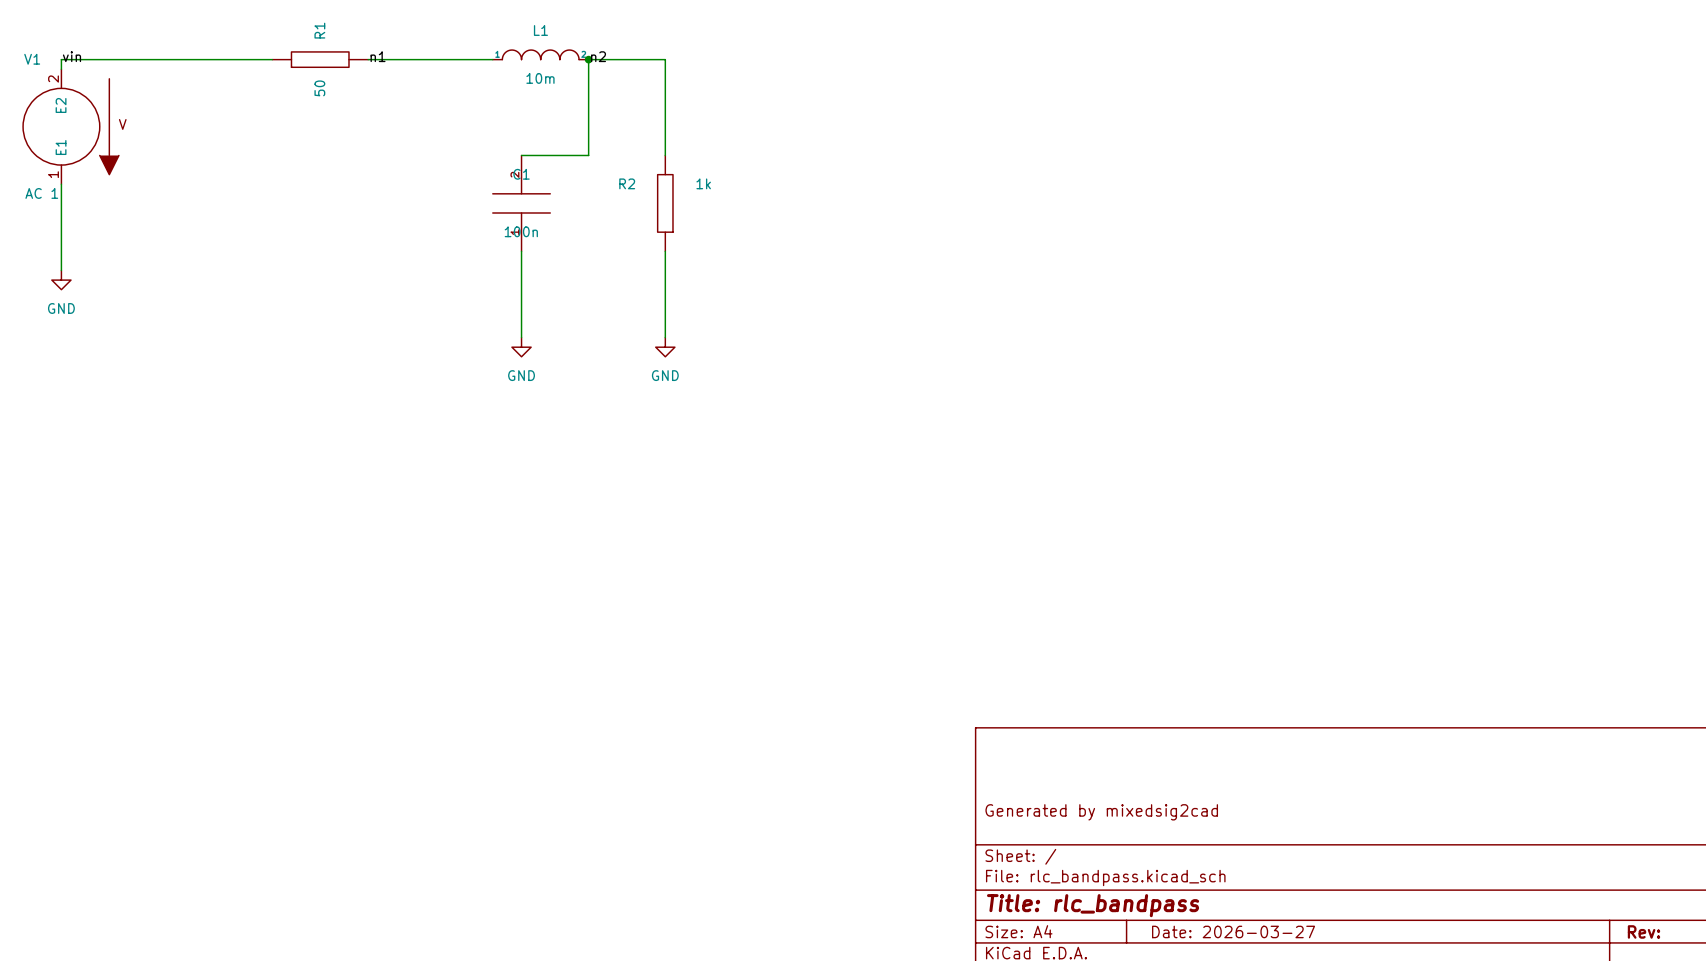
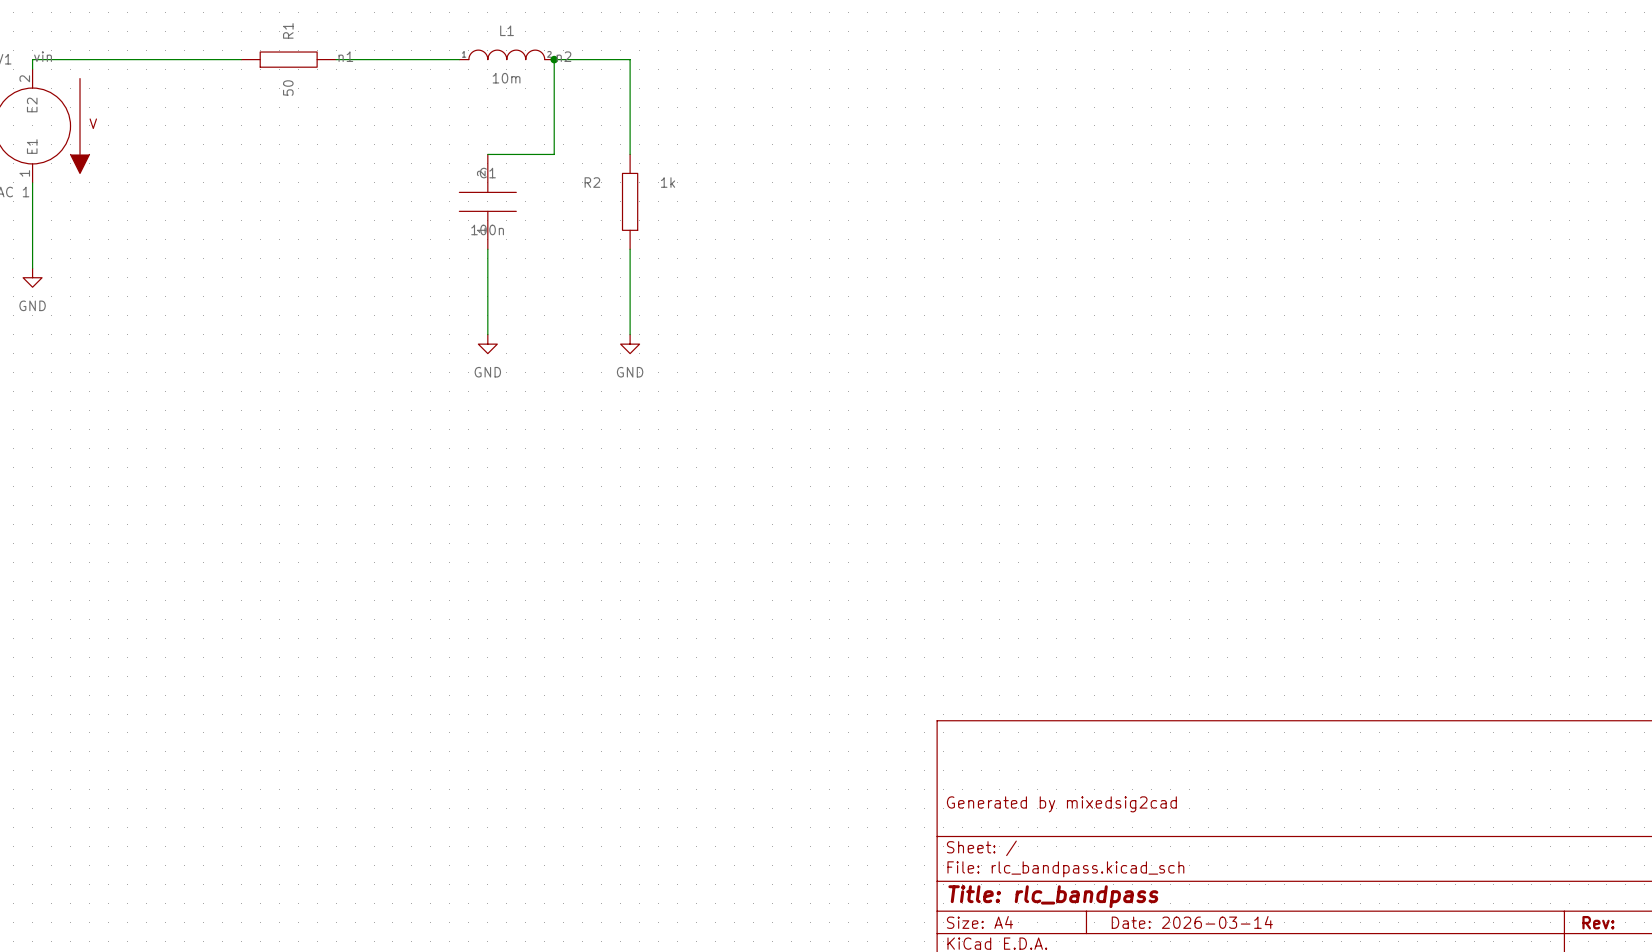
title block: Date: 2026-03-27 (1233, 931) -> Date: 2026-03-14 (1192, 922)

